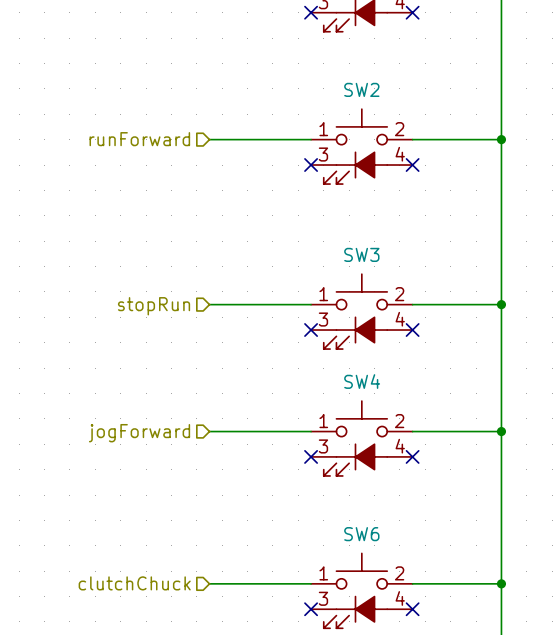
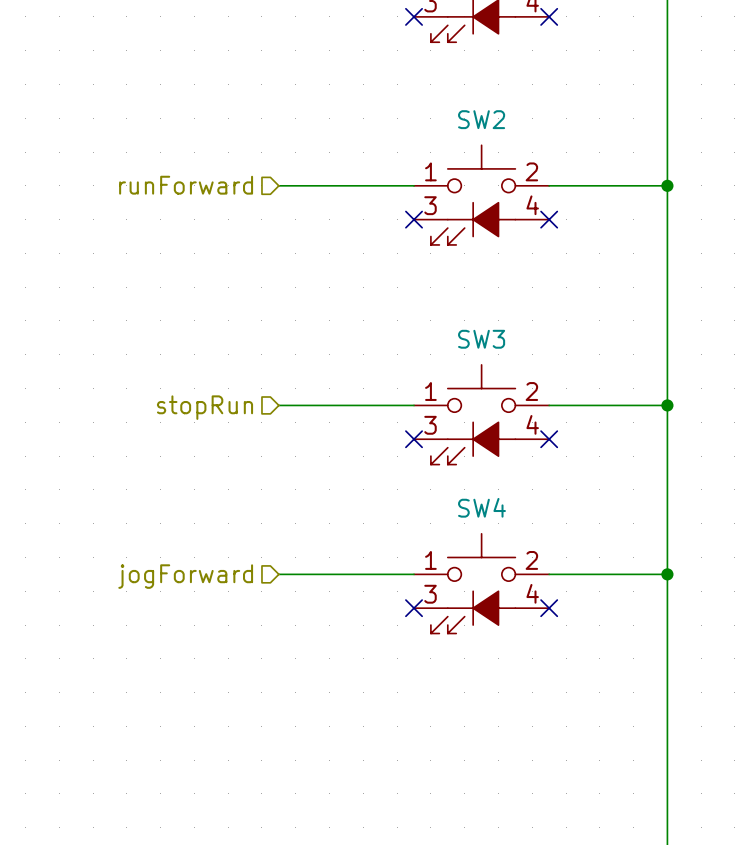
hierarchical label: clutchChuck (134, 583) -> none
wire: (209, 583) (311, 583) -> none
wire: (412, 583) (501, 583) -> none
junction: (501, 583) -> none
SW6: (361, 590) -> none
no-connect mark: (311, 609) -> none
no-connect mark: (412, 609) -> none

